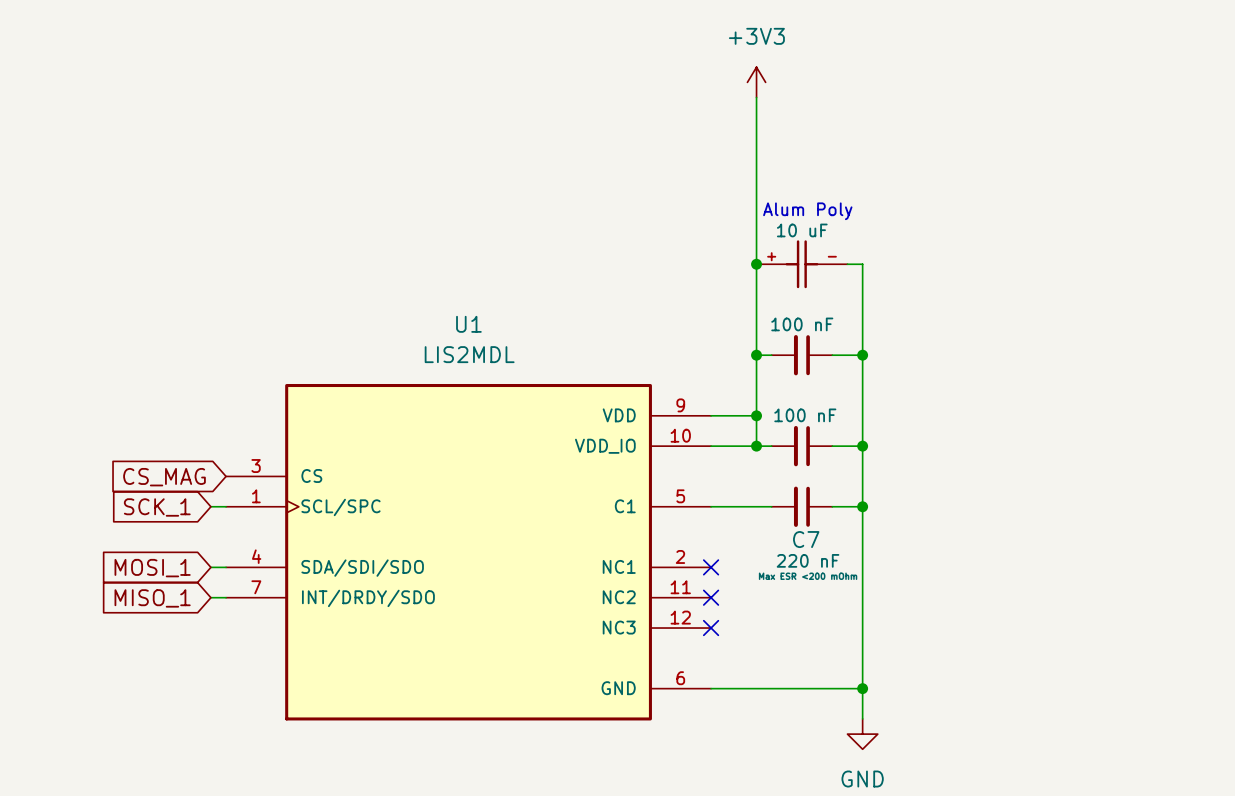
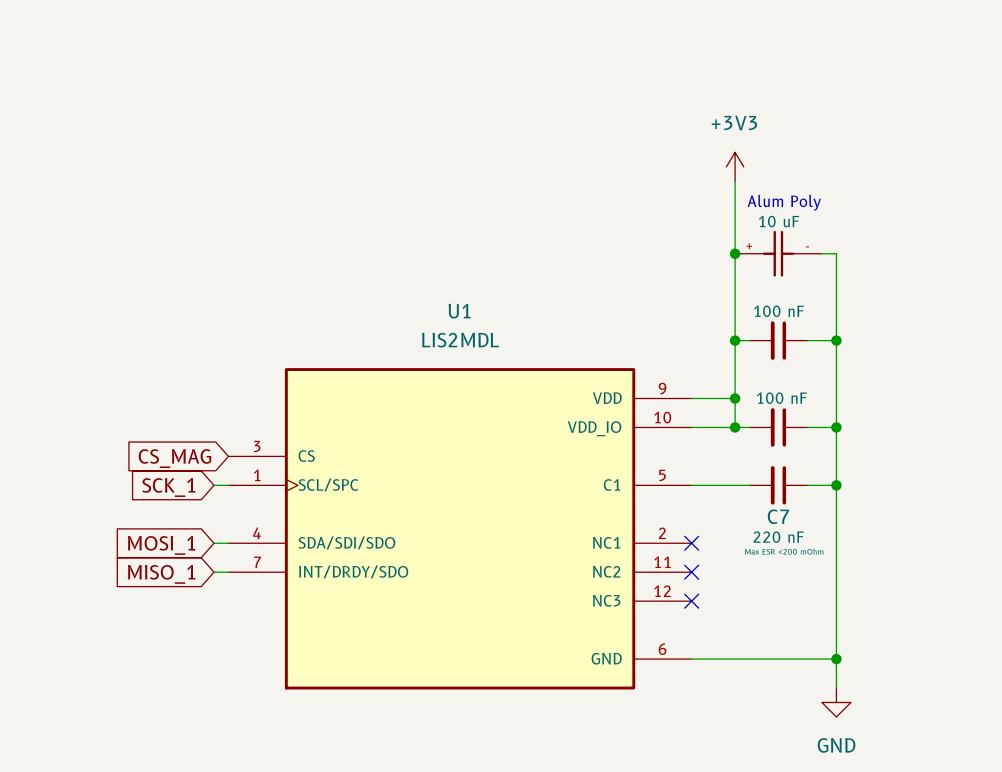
power symbol position: +3V3 (756, 82) -> +3V3 (735, 166)
wire: (756, 97) (756, 188) -> none

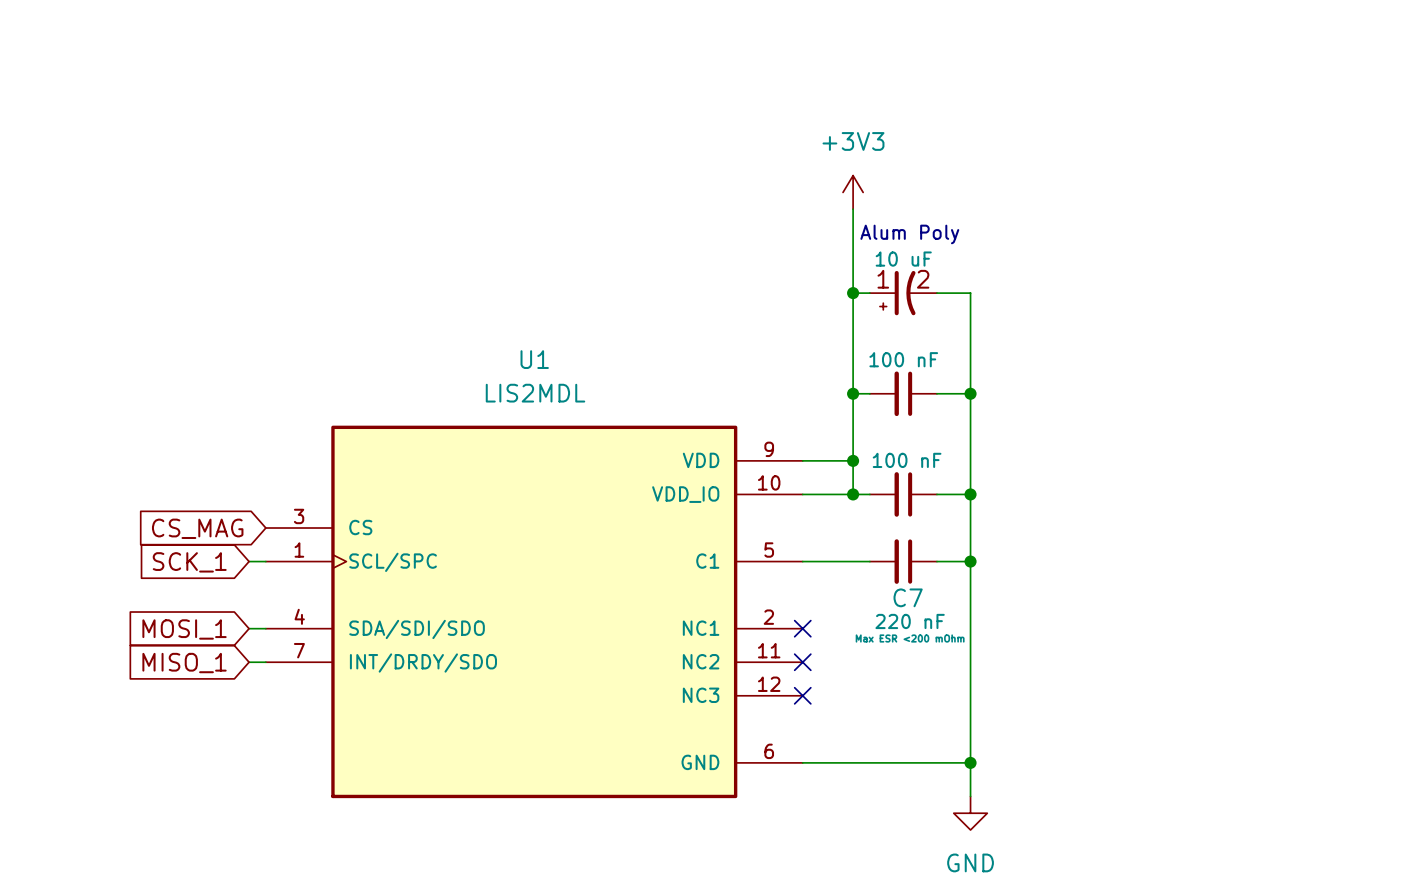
part symbol: [735, 230, 822, 277] -> [869, 270, 937, 316]

